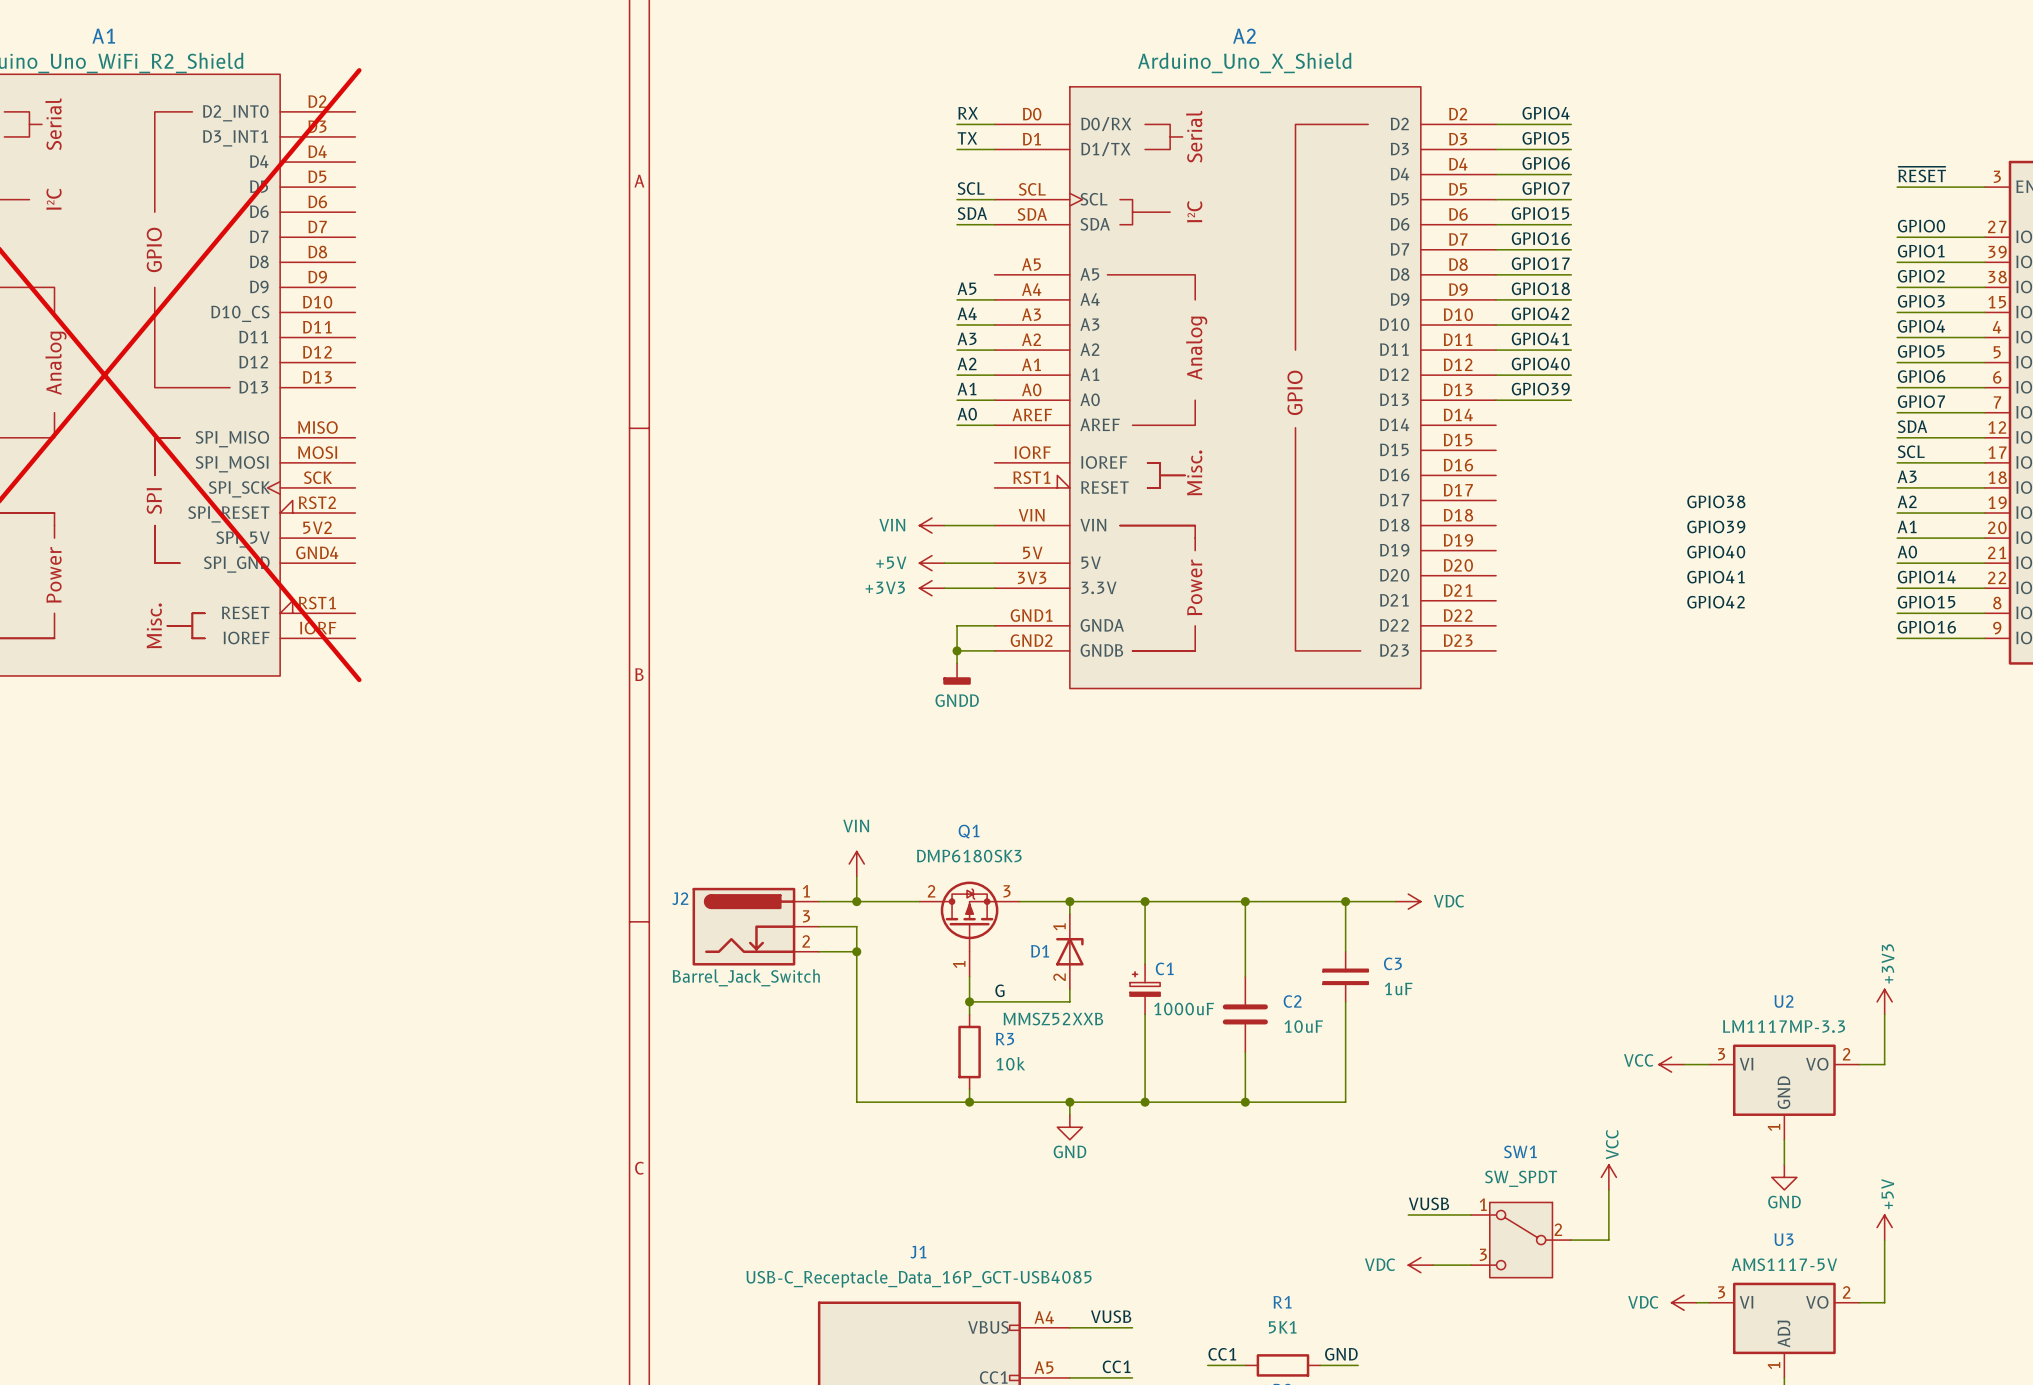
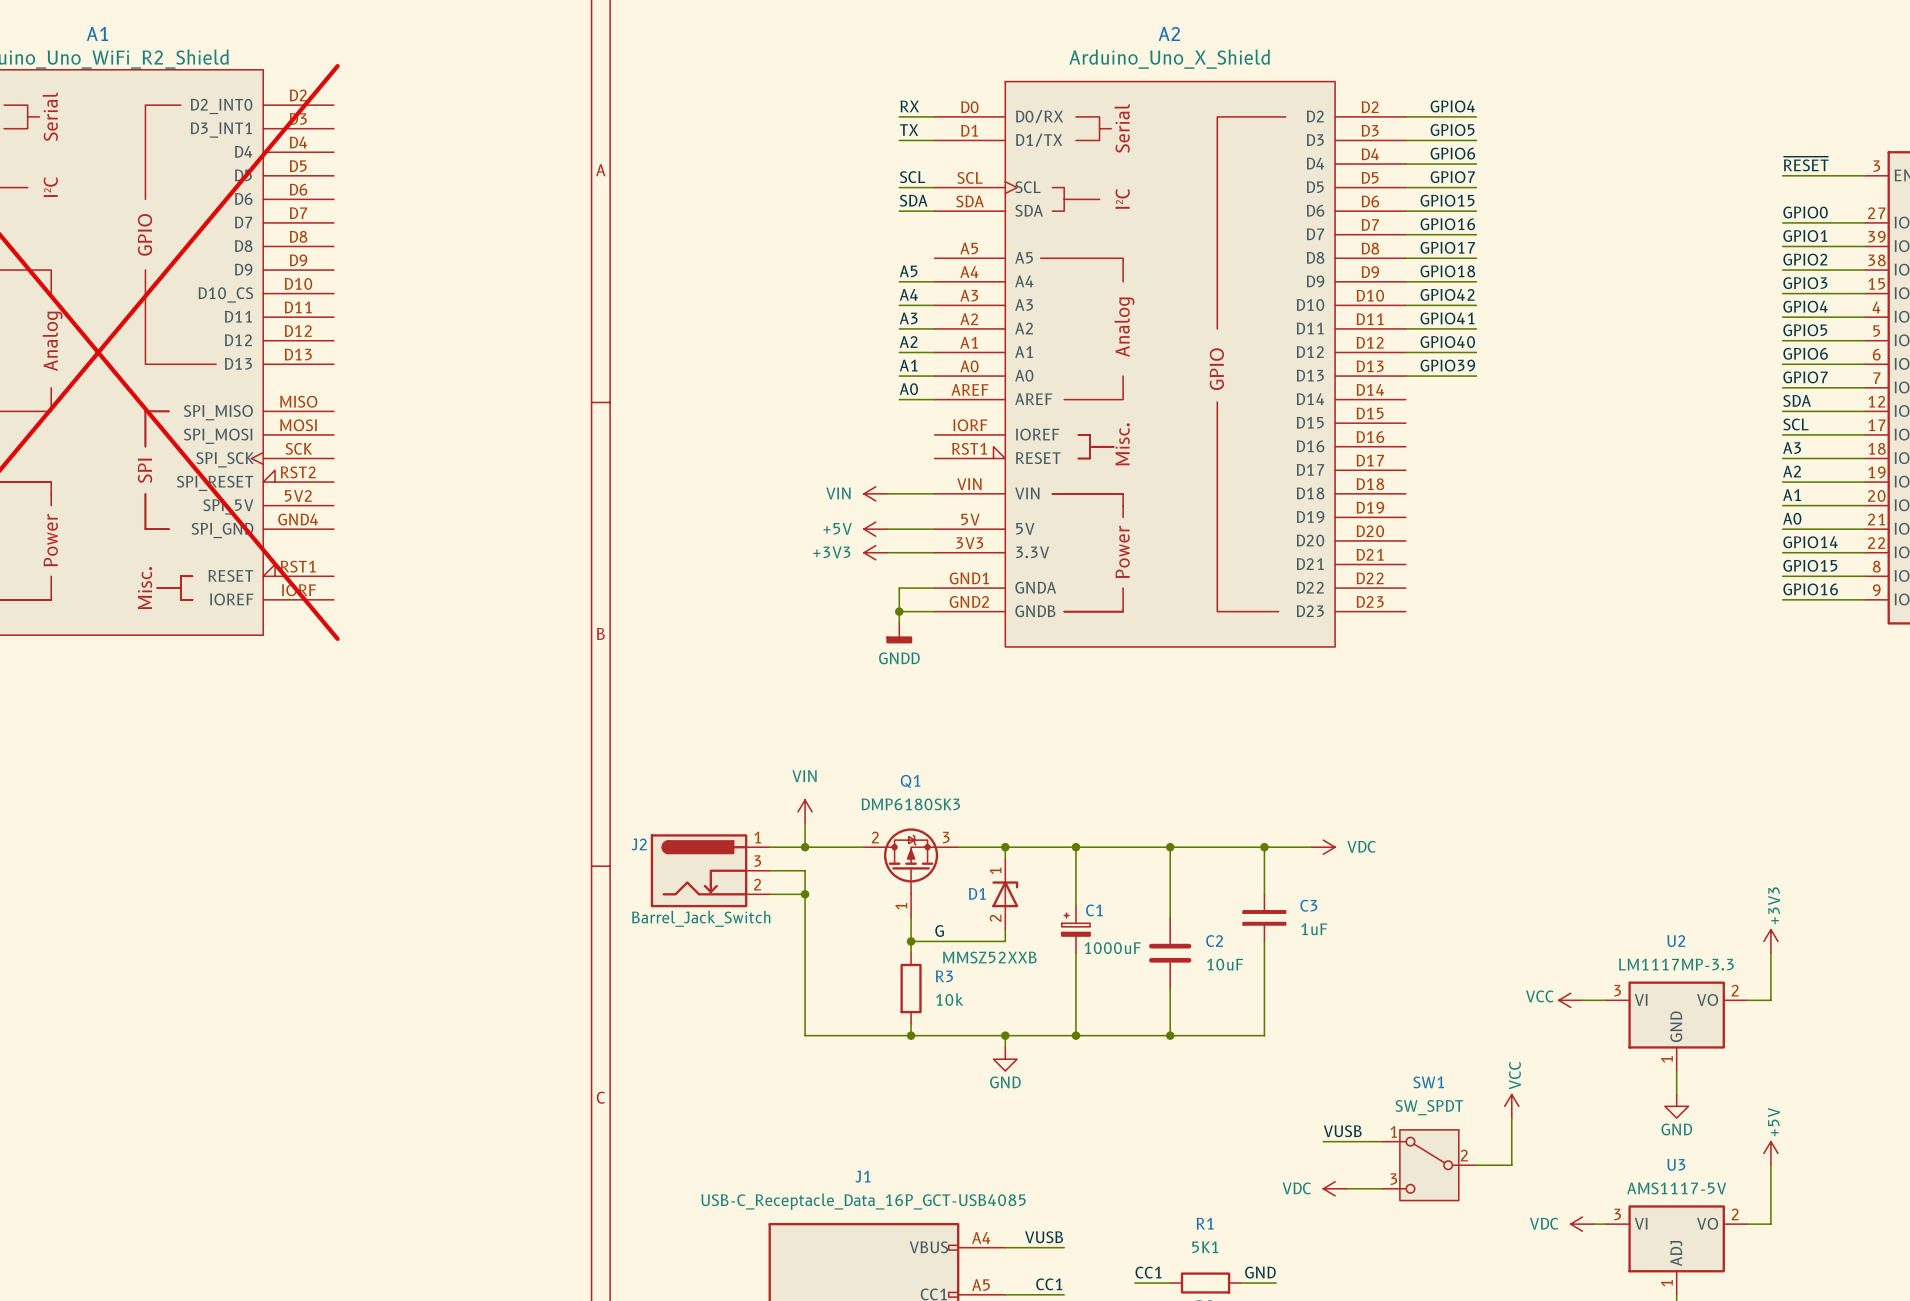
label: GPIO38 (1716, 501) -> none
label: GPIO39 (1716, 526) -> none
label: GPIO40 (1716, 552) -> none
label: GPIO41 (1715, 577) -> none
label: GPIO42 (1716, 602) -> none

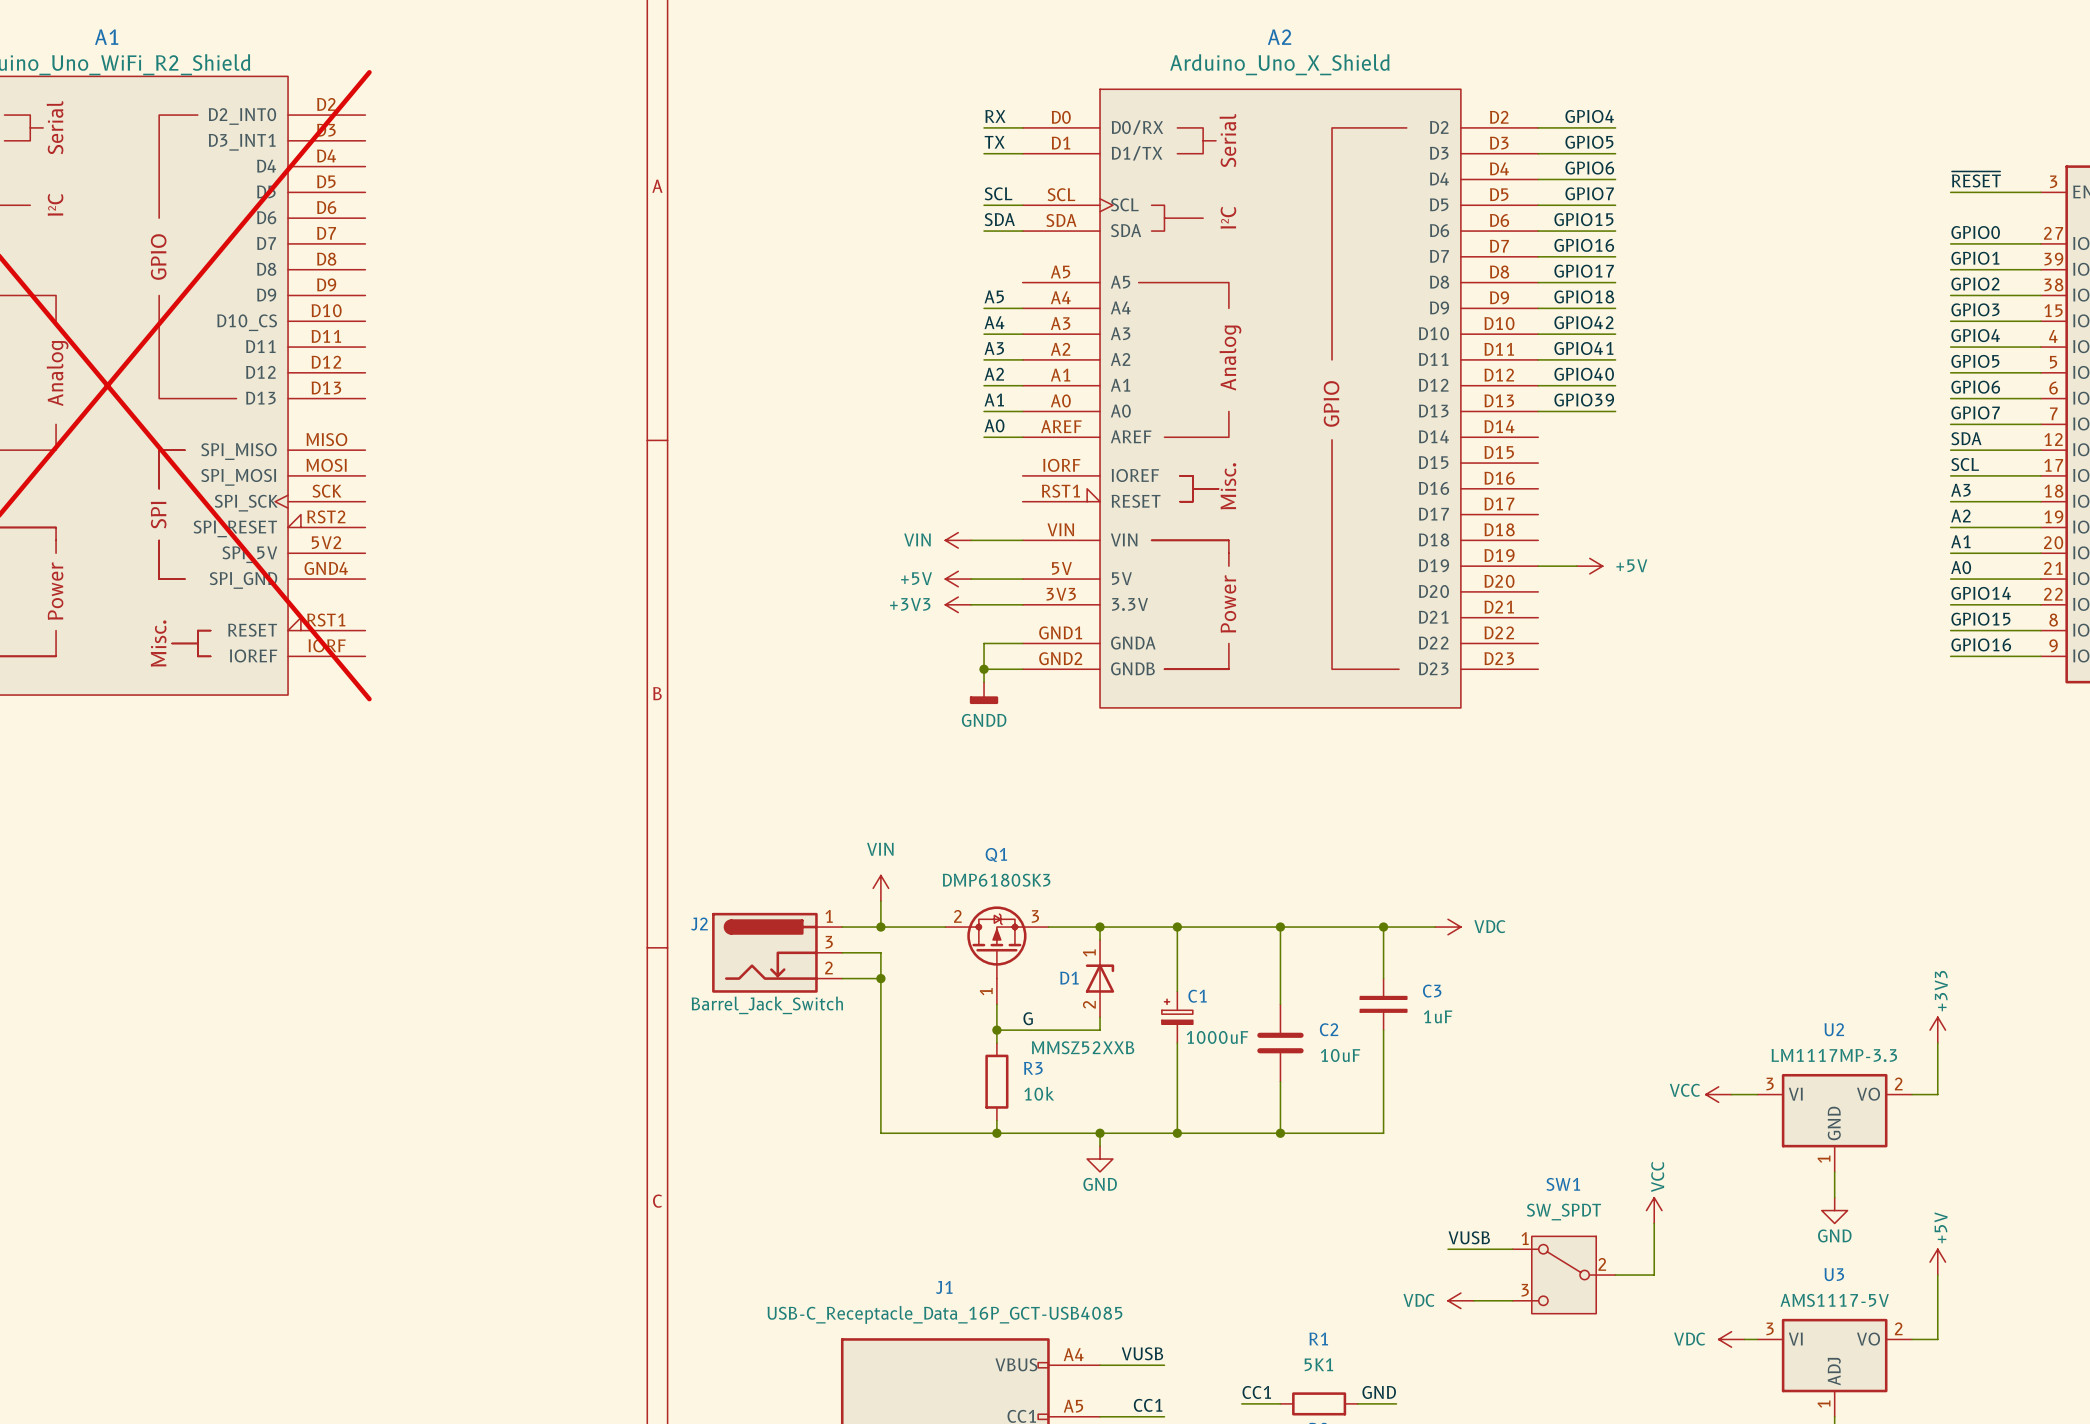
wire: none -> (1538, 566) (1576, 566)
power symbol: none -> +5V (1589, 566)

